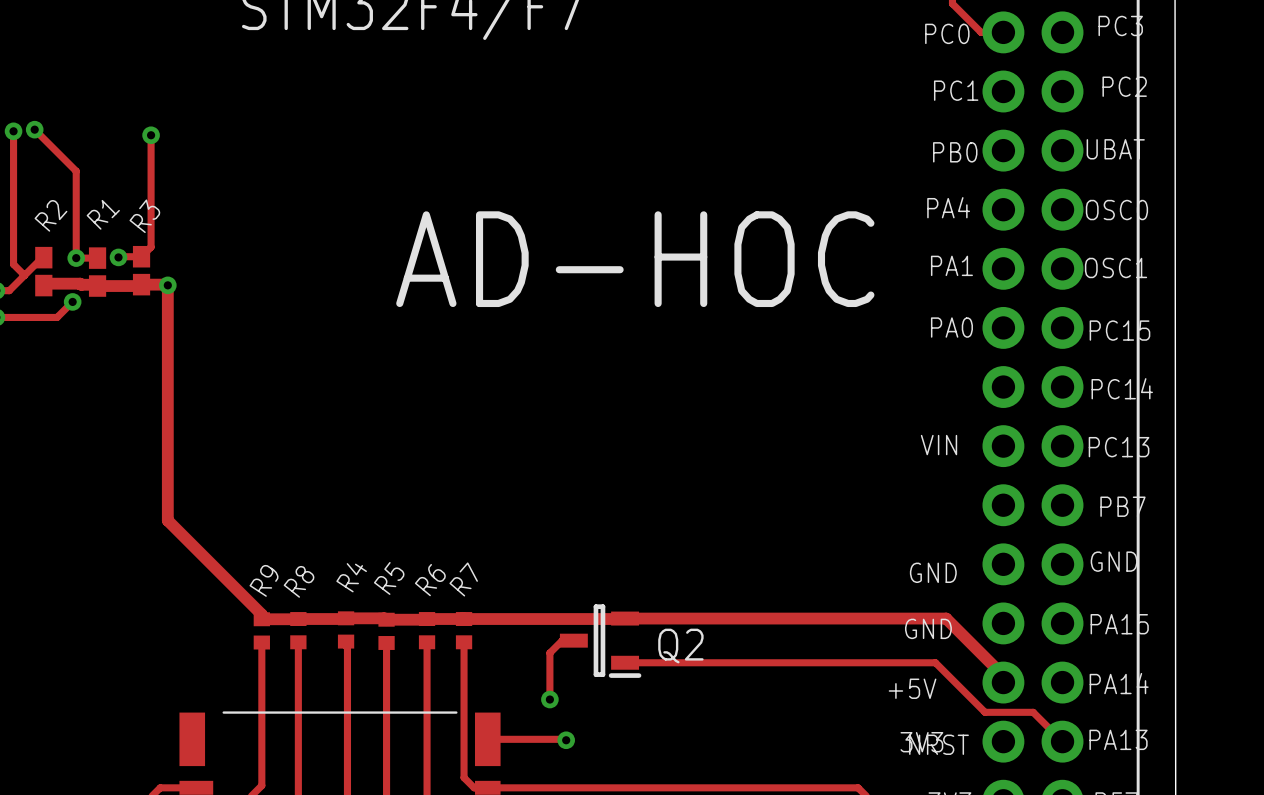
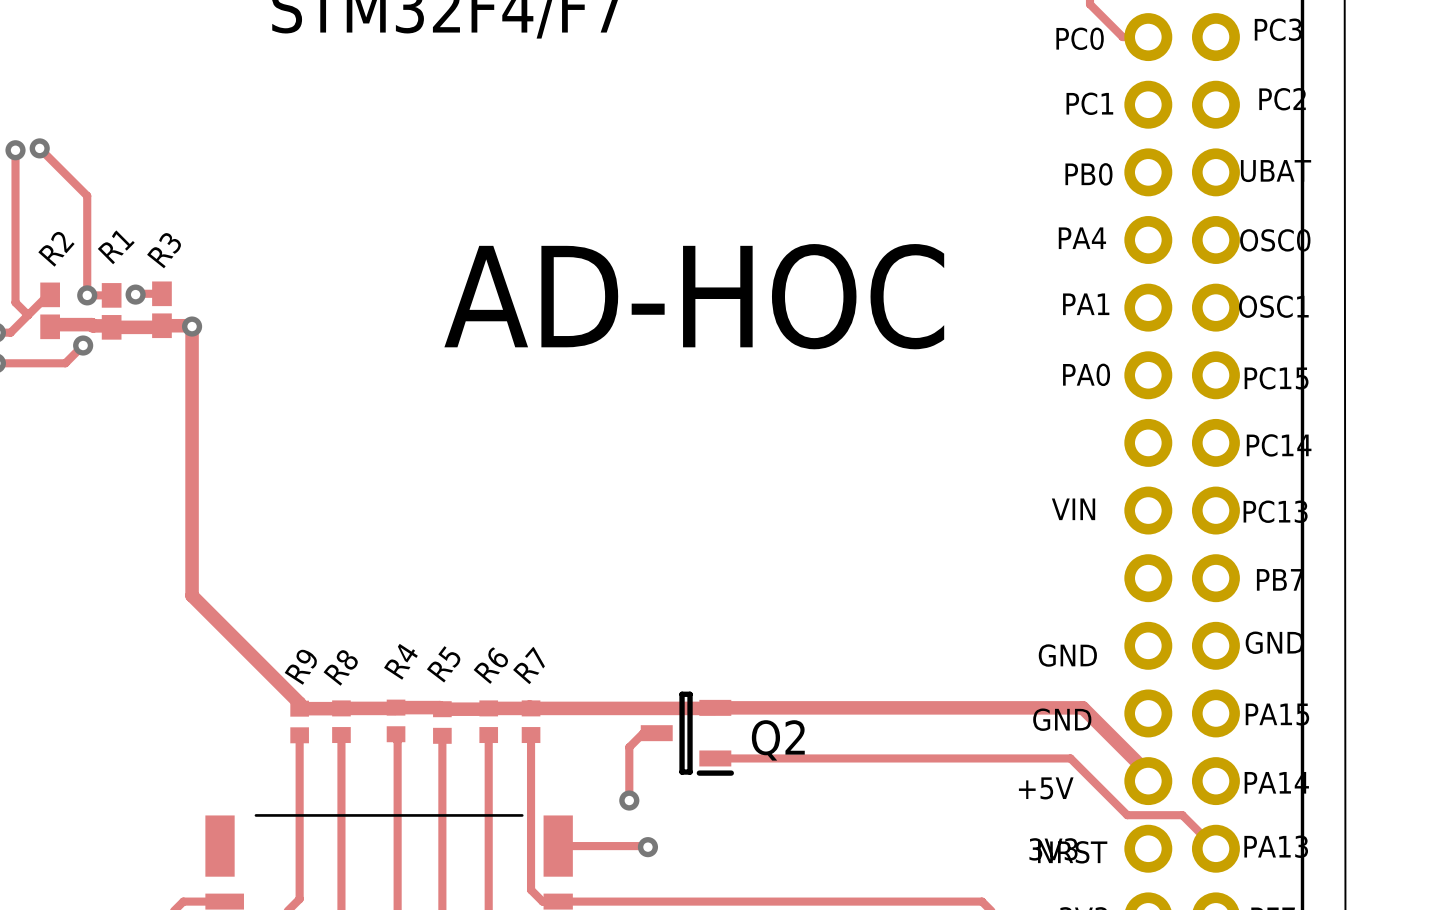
track: (151, 135) (151, 247) (141, 256) -> none
via: (151, 135) -> none

